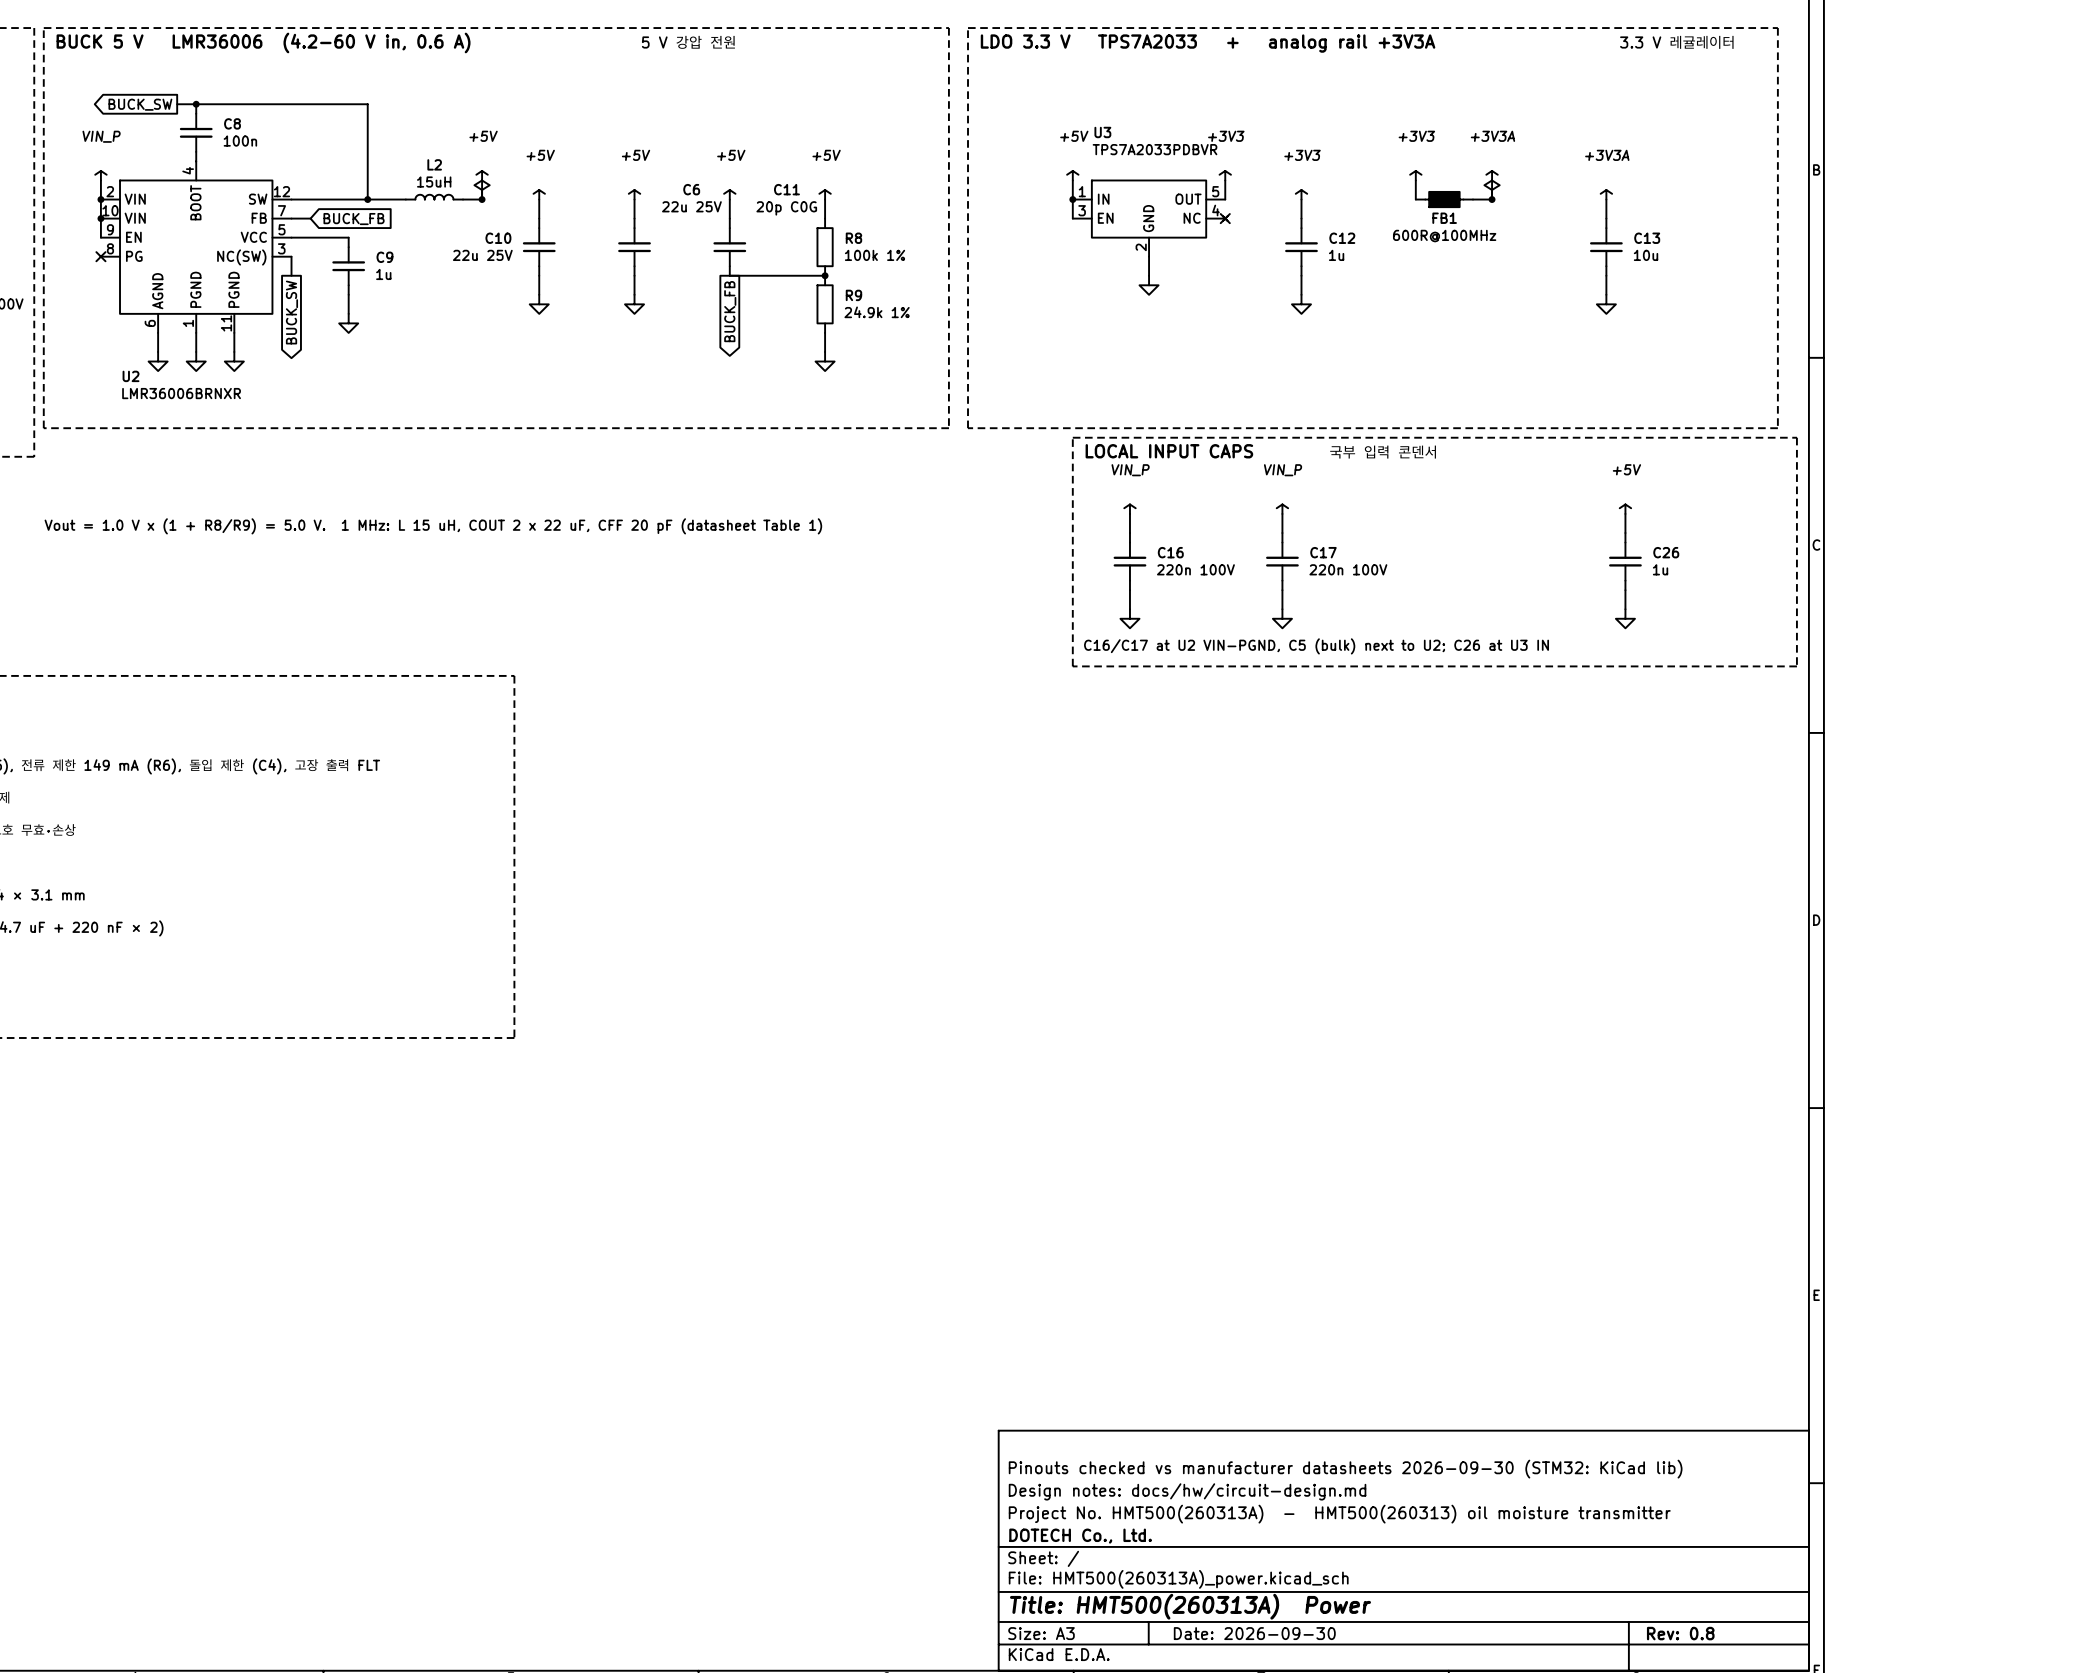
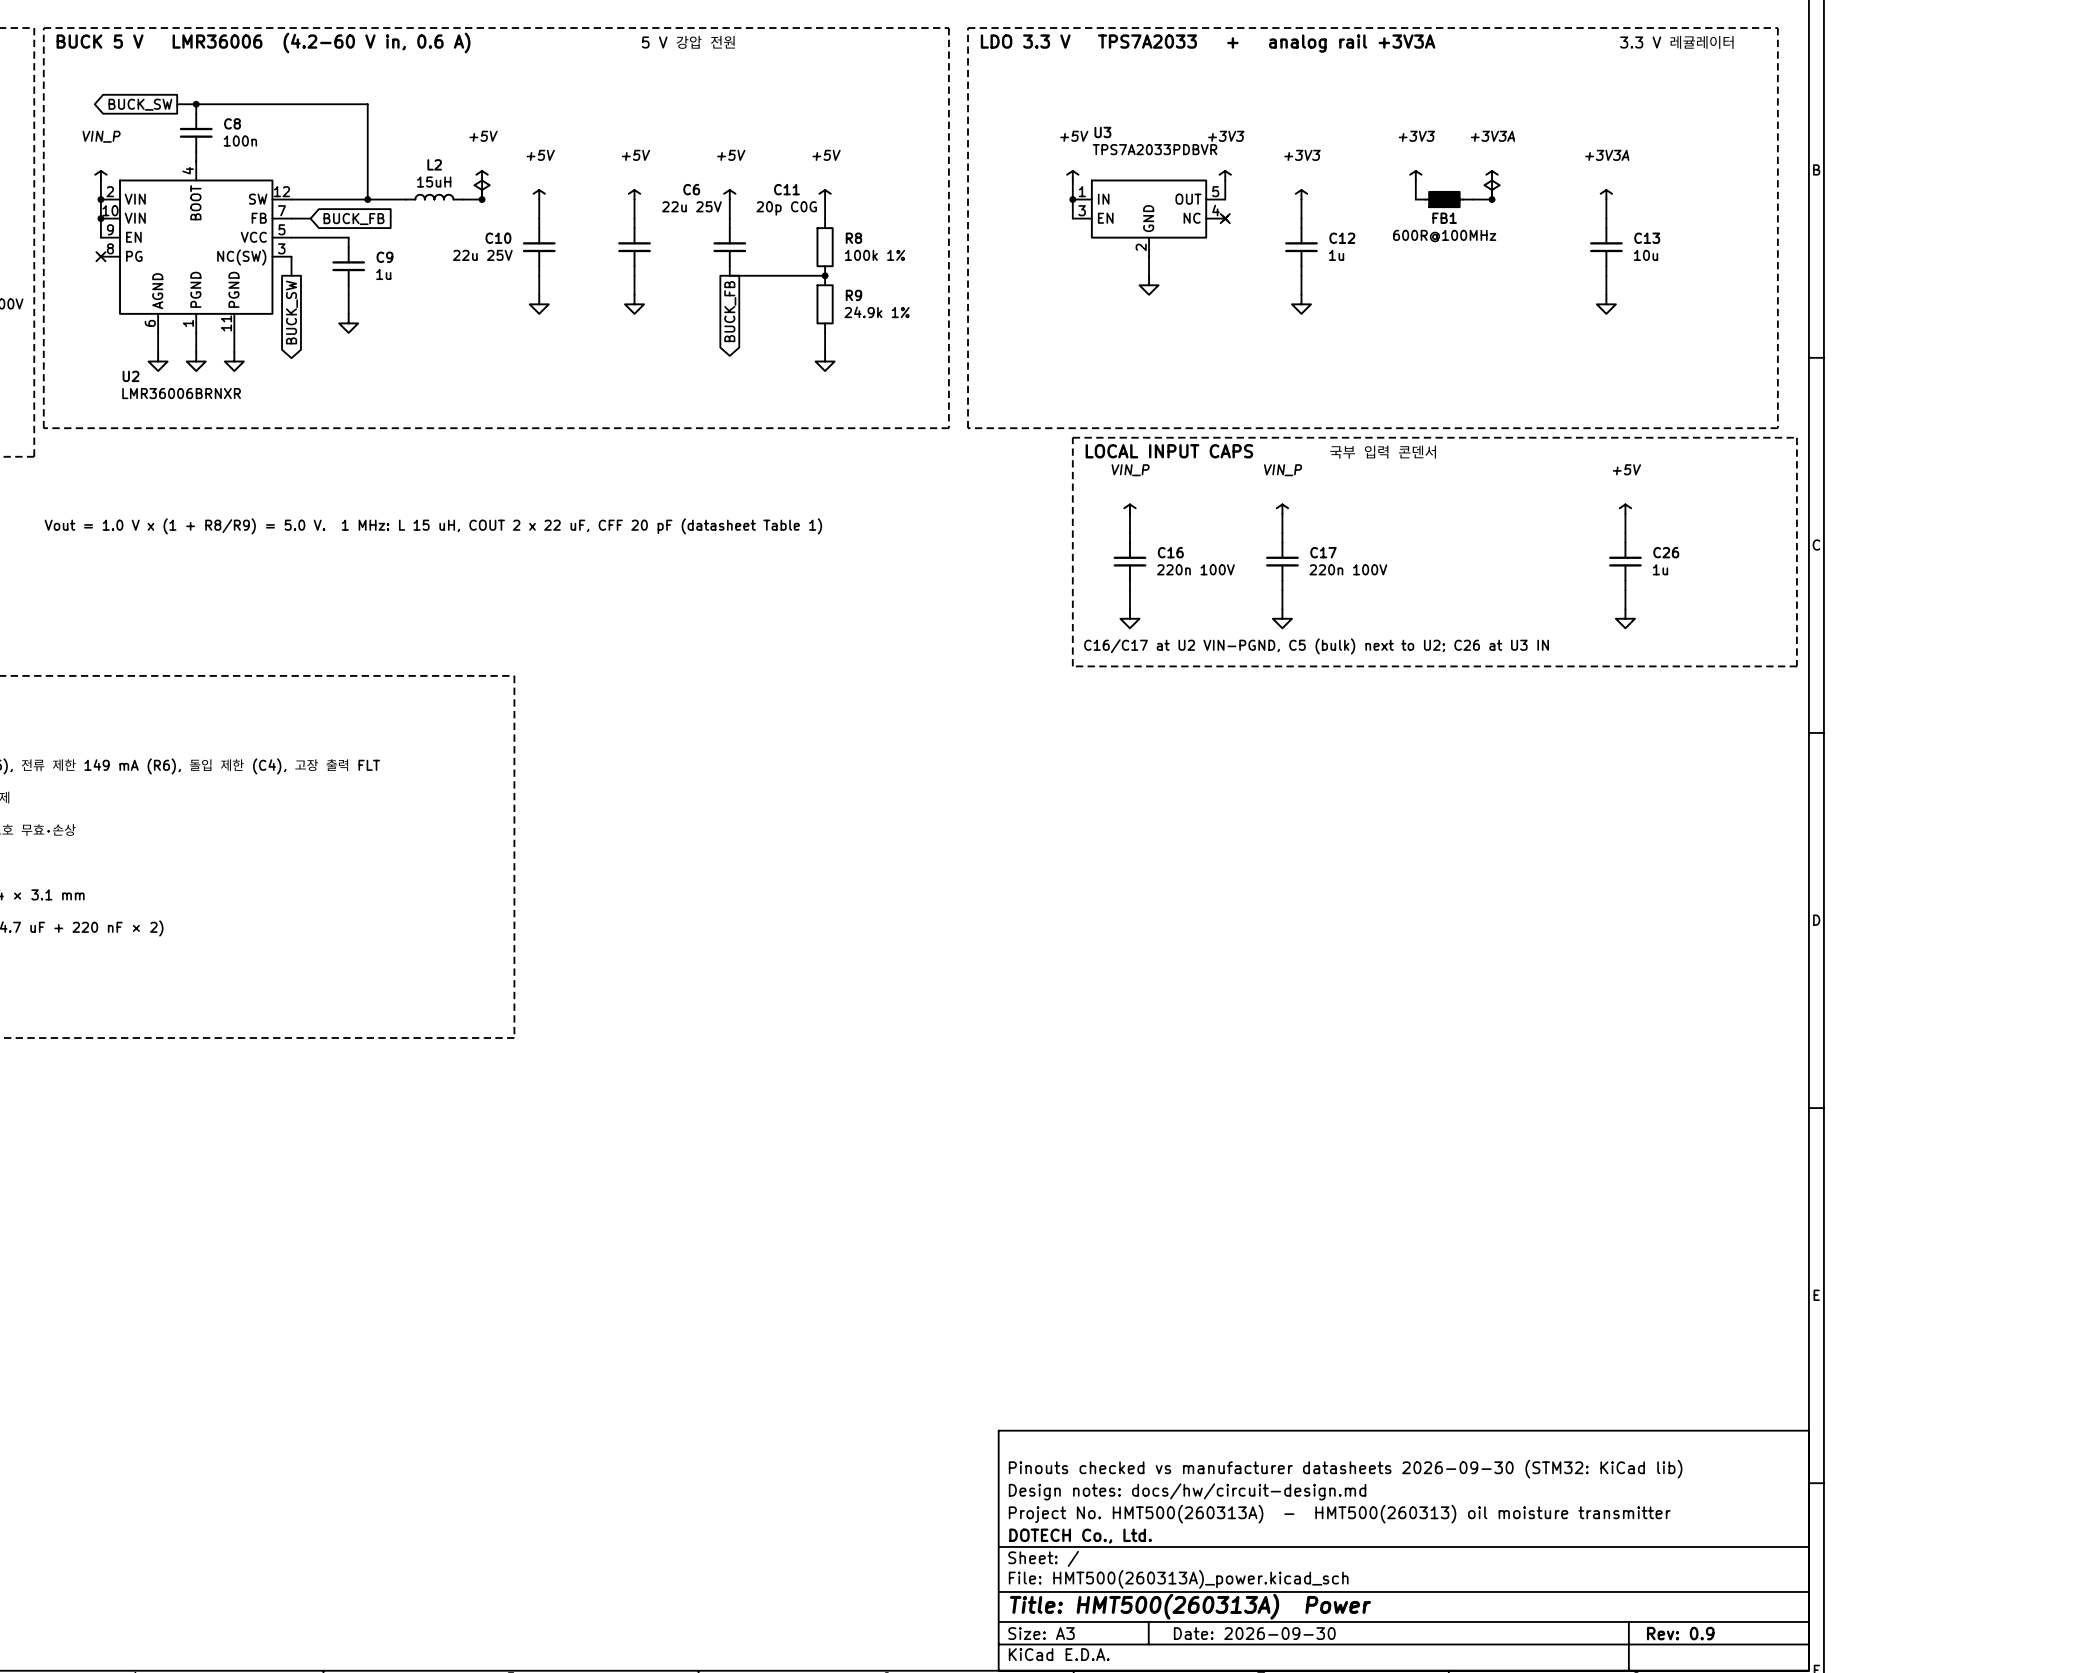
title block: Rev: 0.8 (1680, 1633) -> Rev: 0.9 (1680, 1633)

